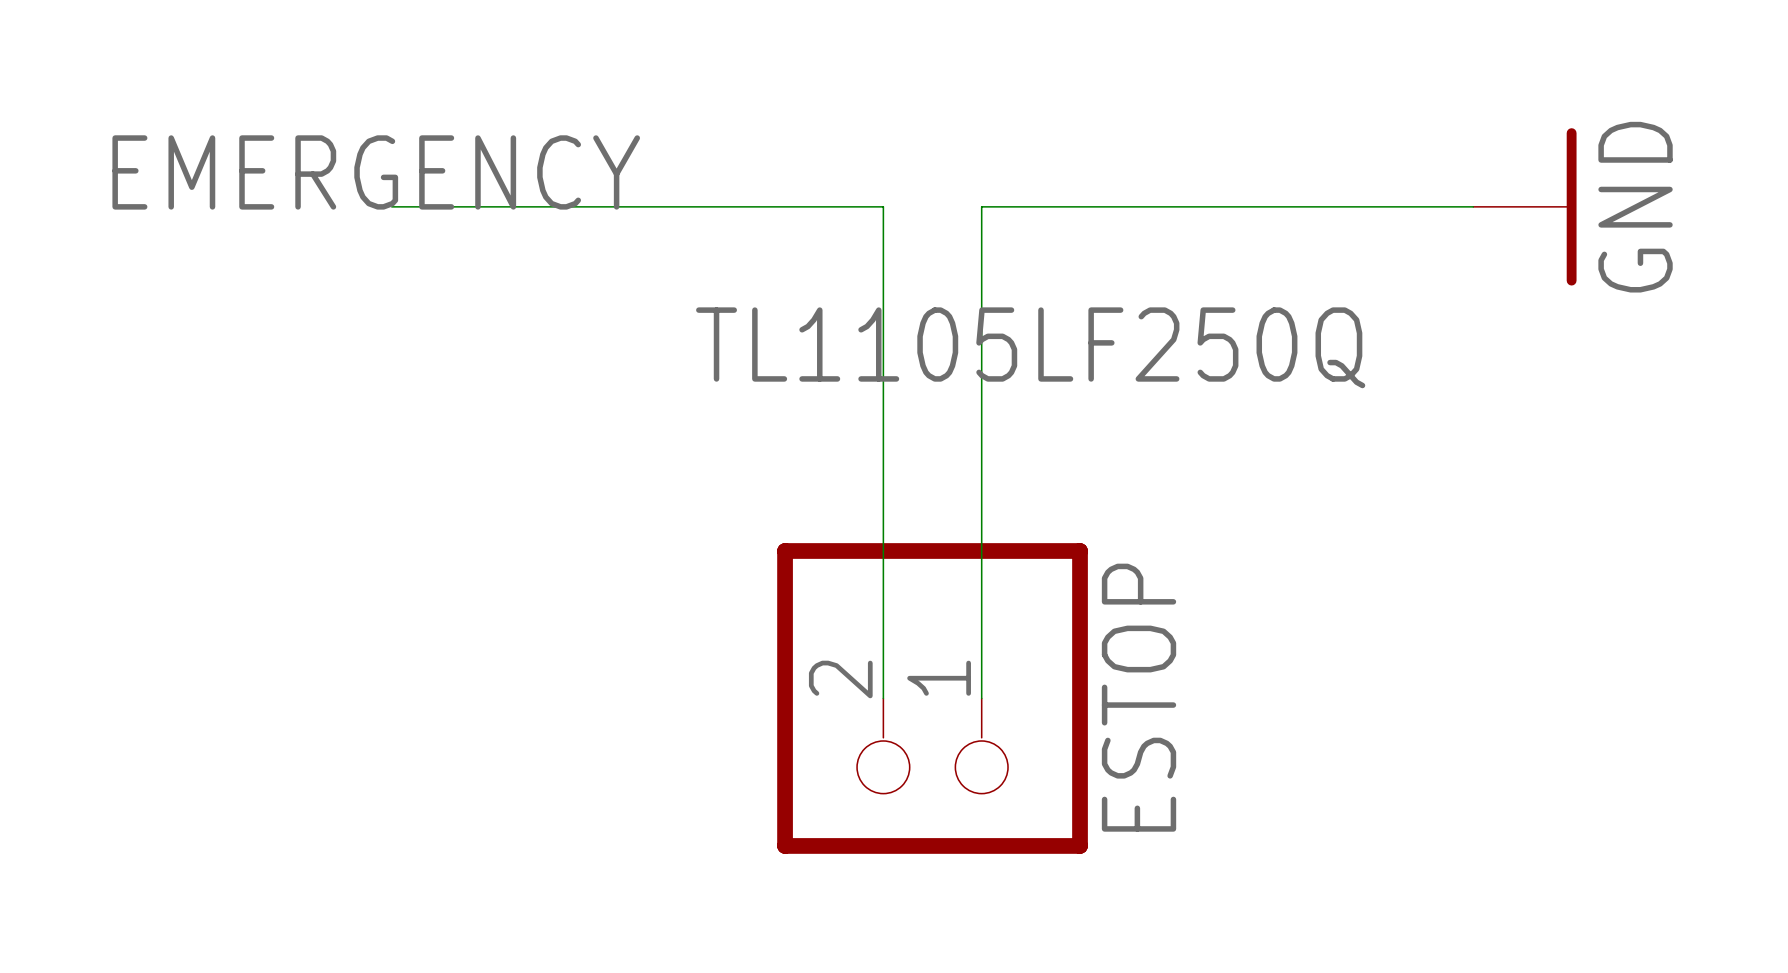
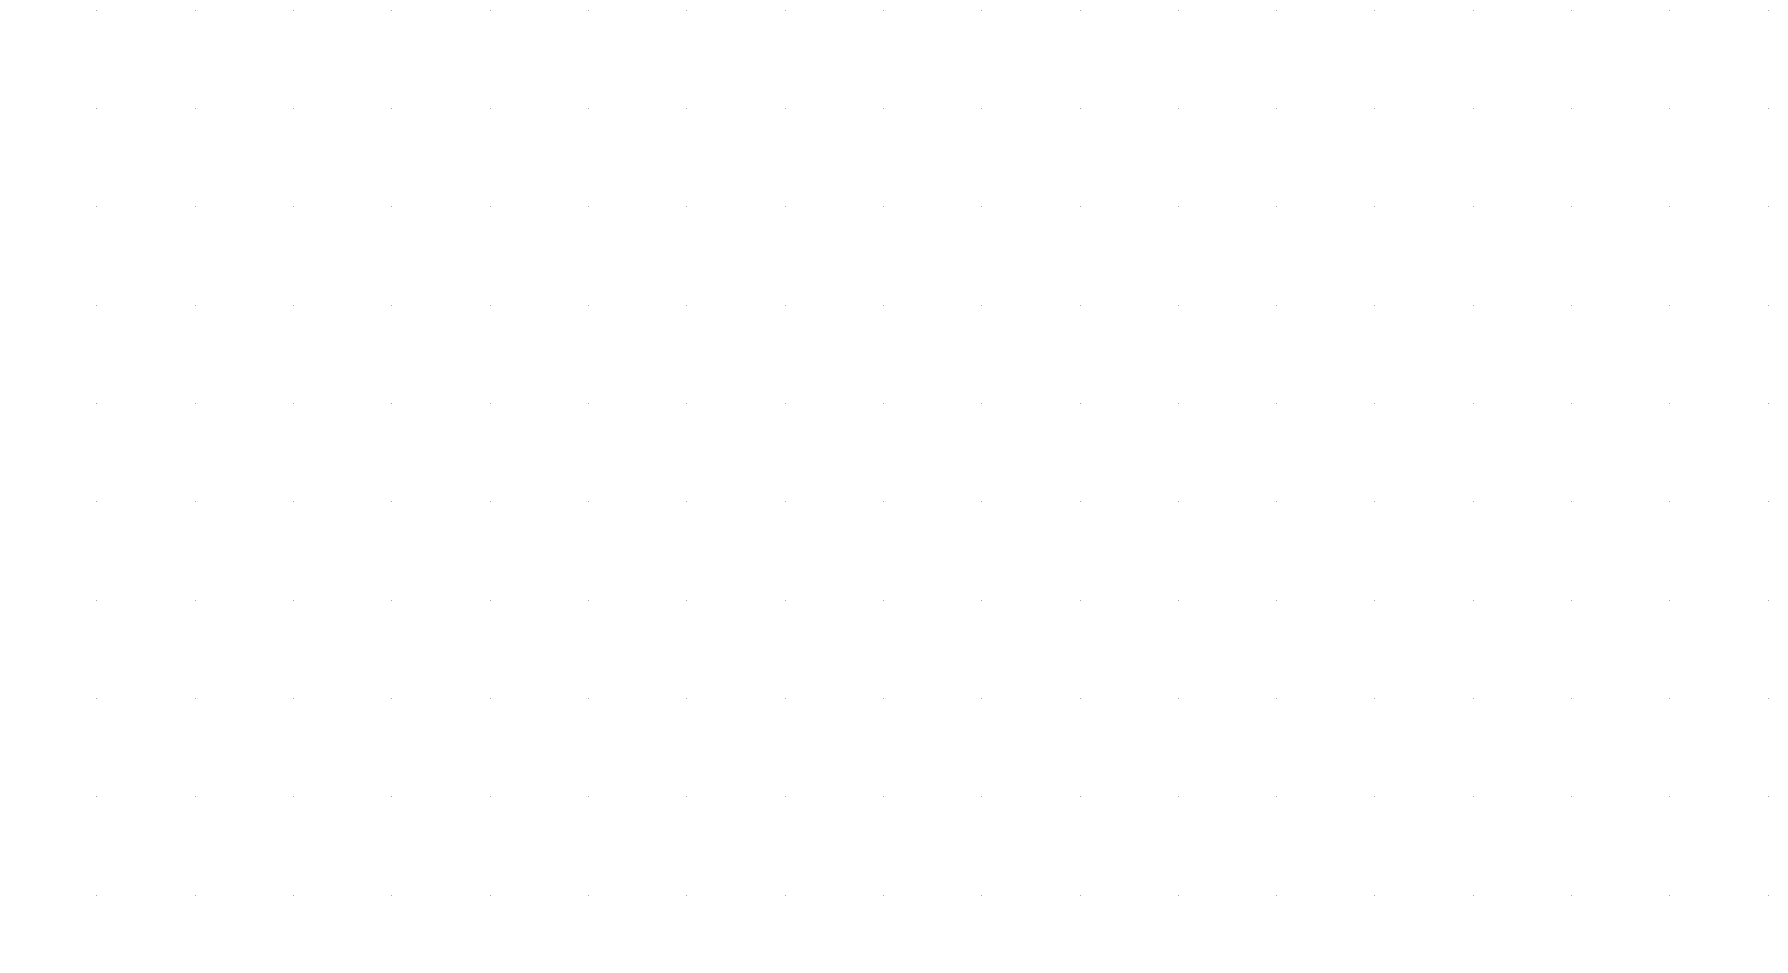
label: EMERGENCY (376, 172) -> none
wire: (391, 206) (883, 206) (883, 698) -> none
wire: (1473, 206) (981, 206) (981, 698) -> none
power symbol: GND (1524, 206) -> none
text: TL1105LF250Q (1030, 347) -> none
ESTOP: (932, 698) -> none

